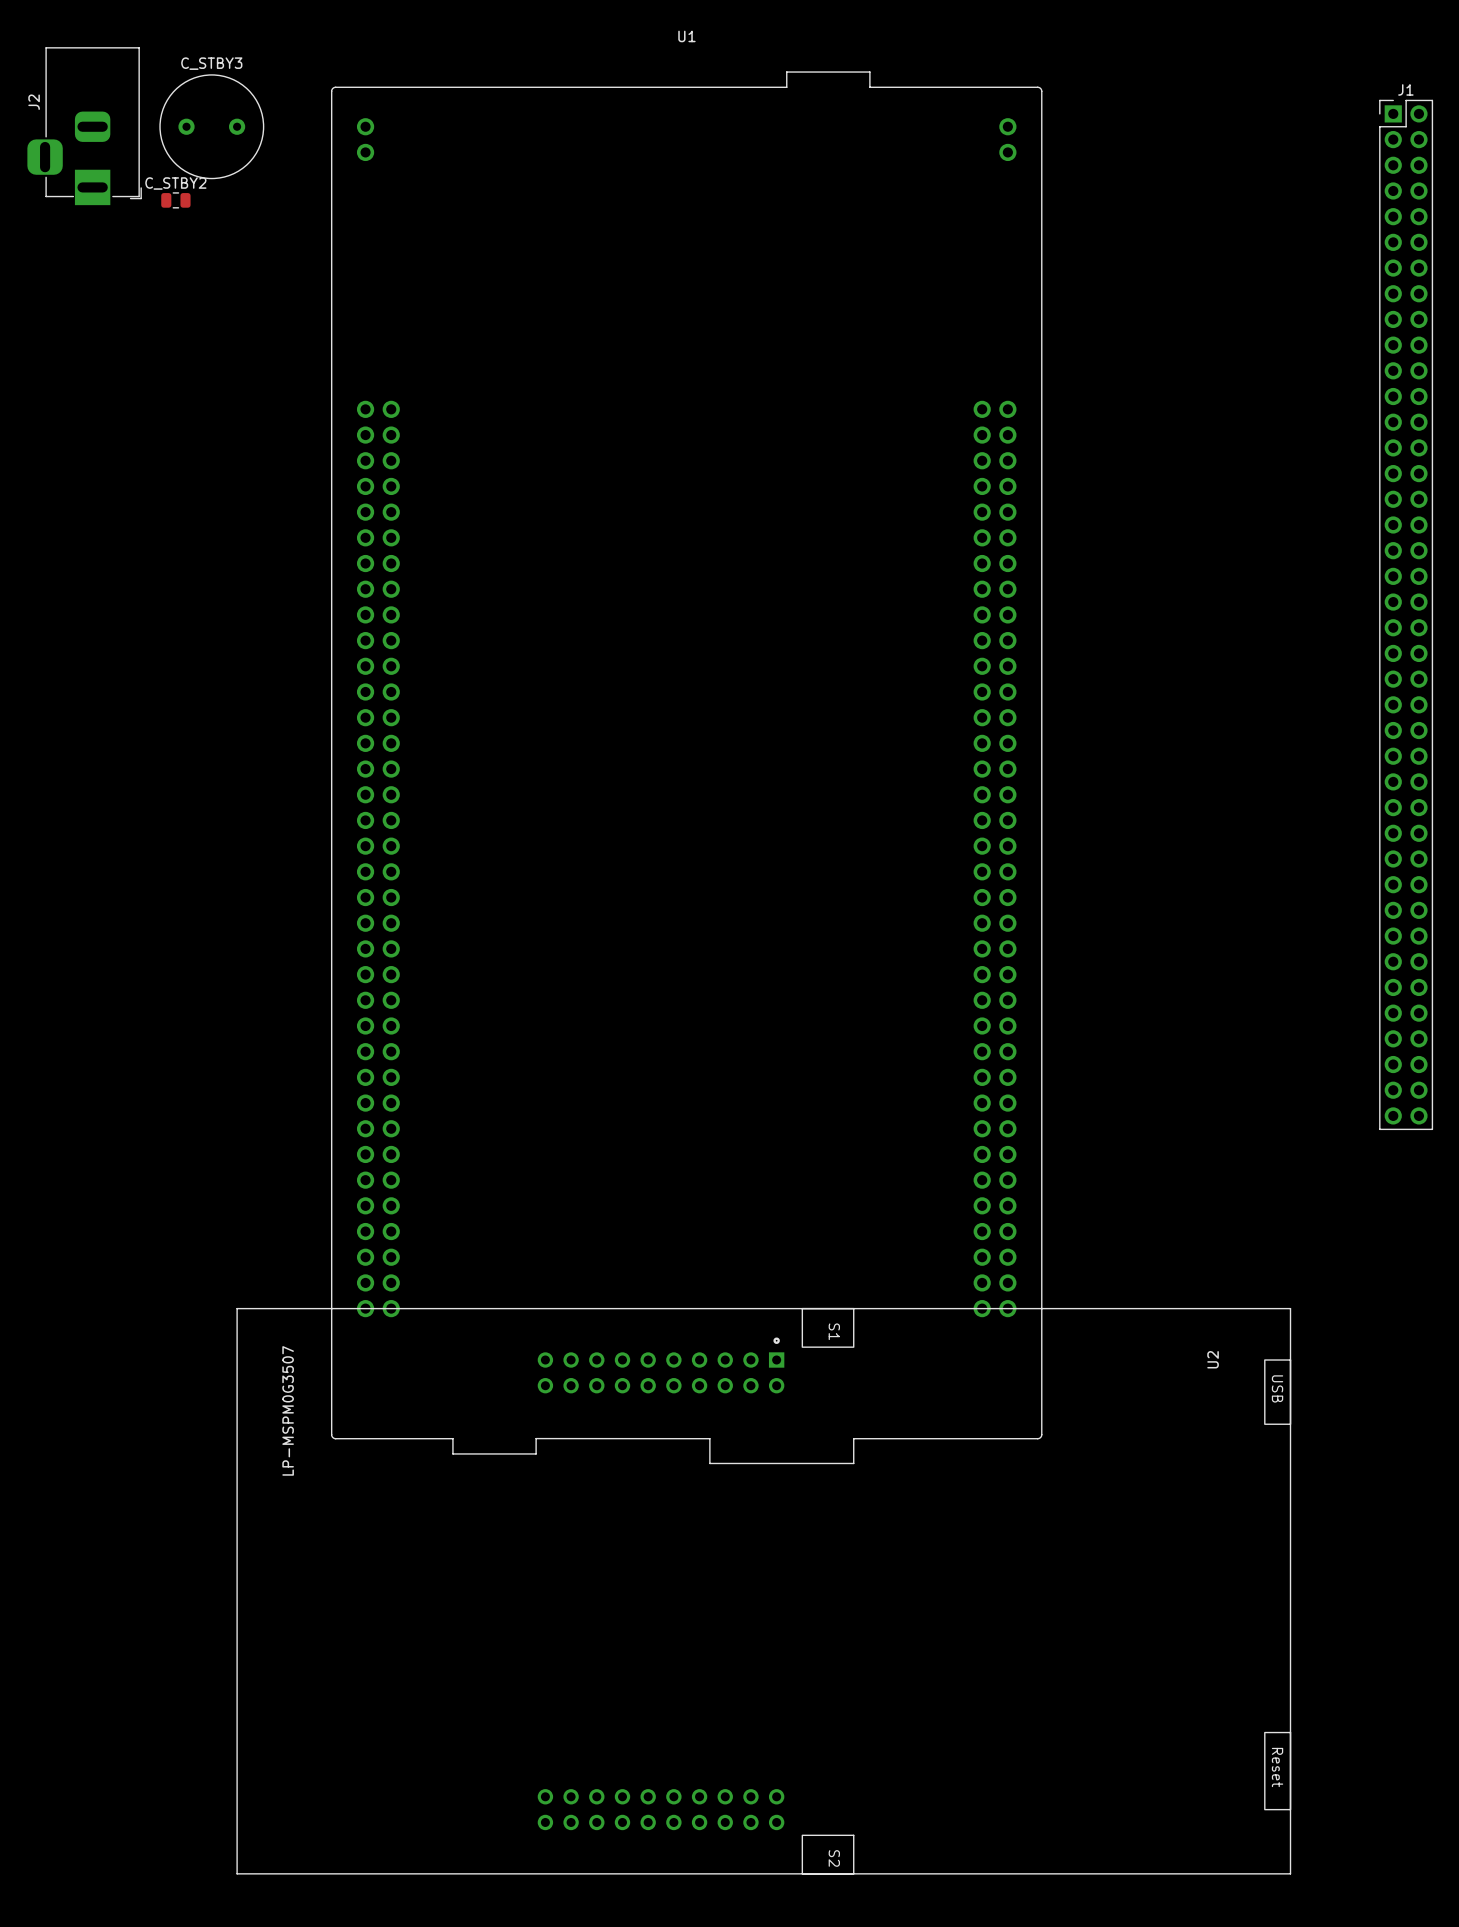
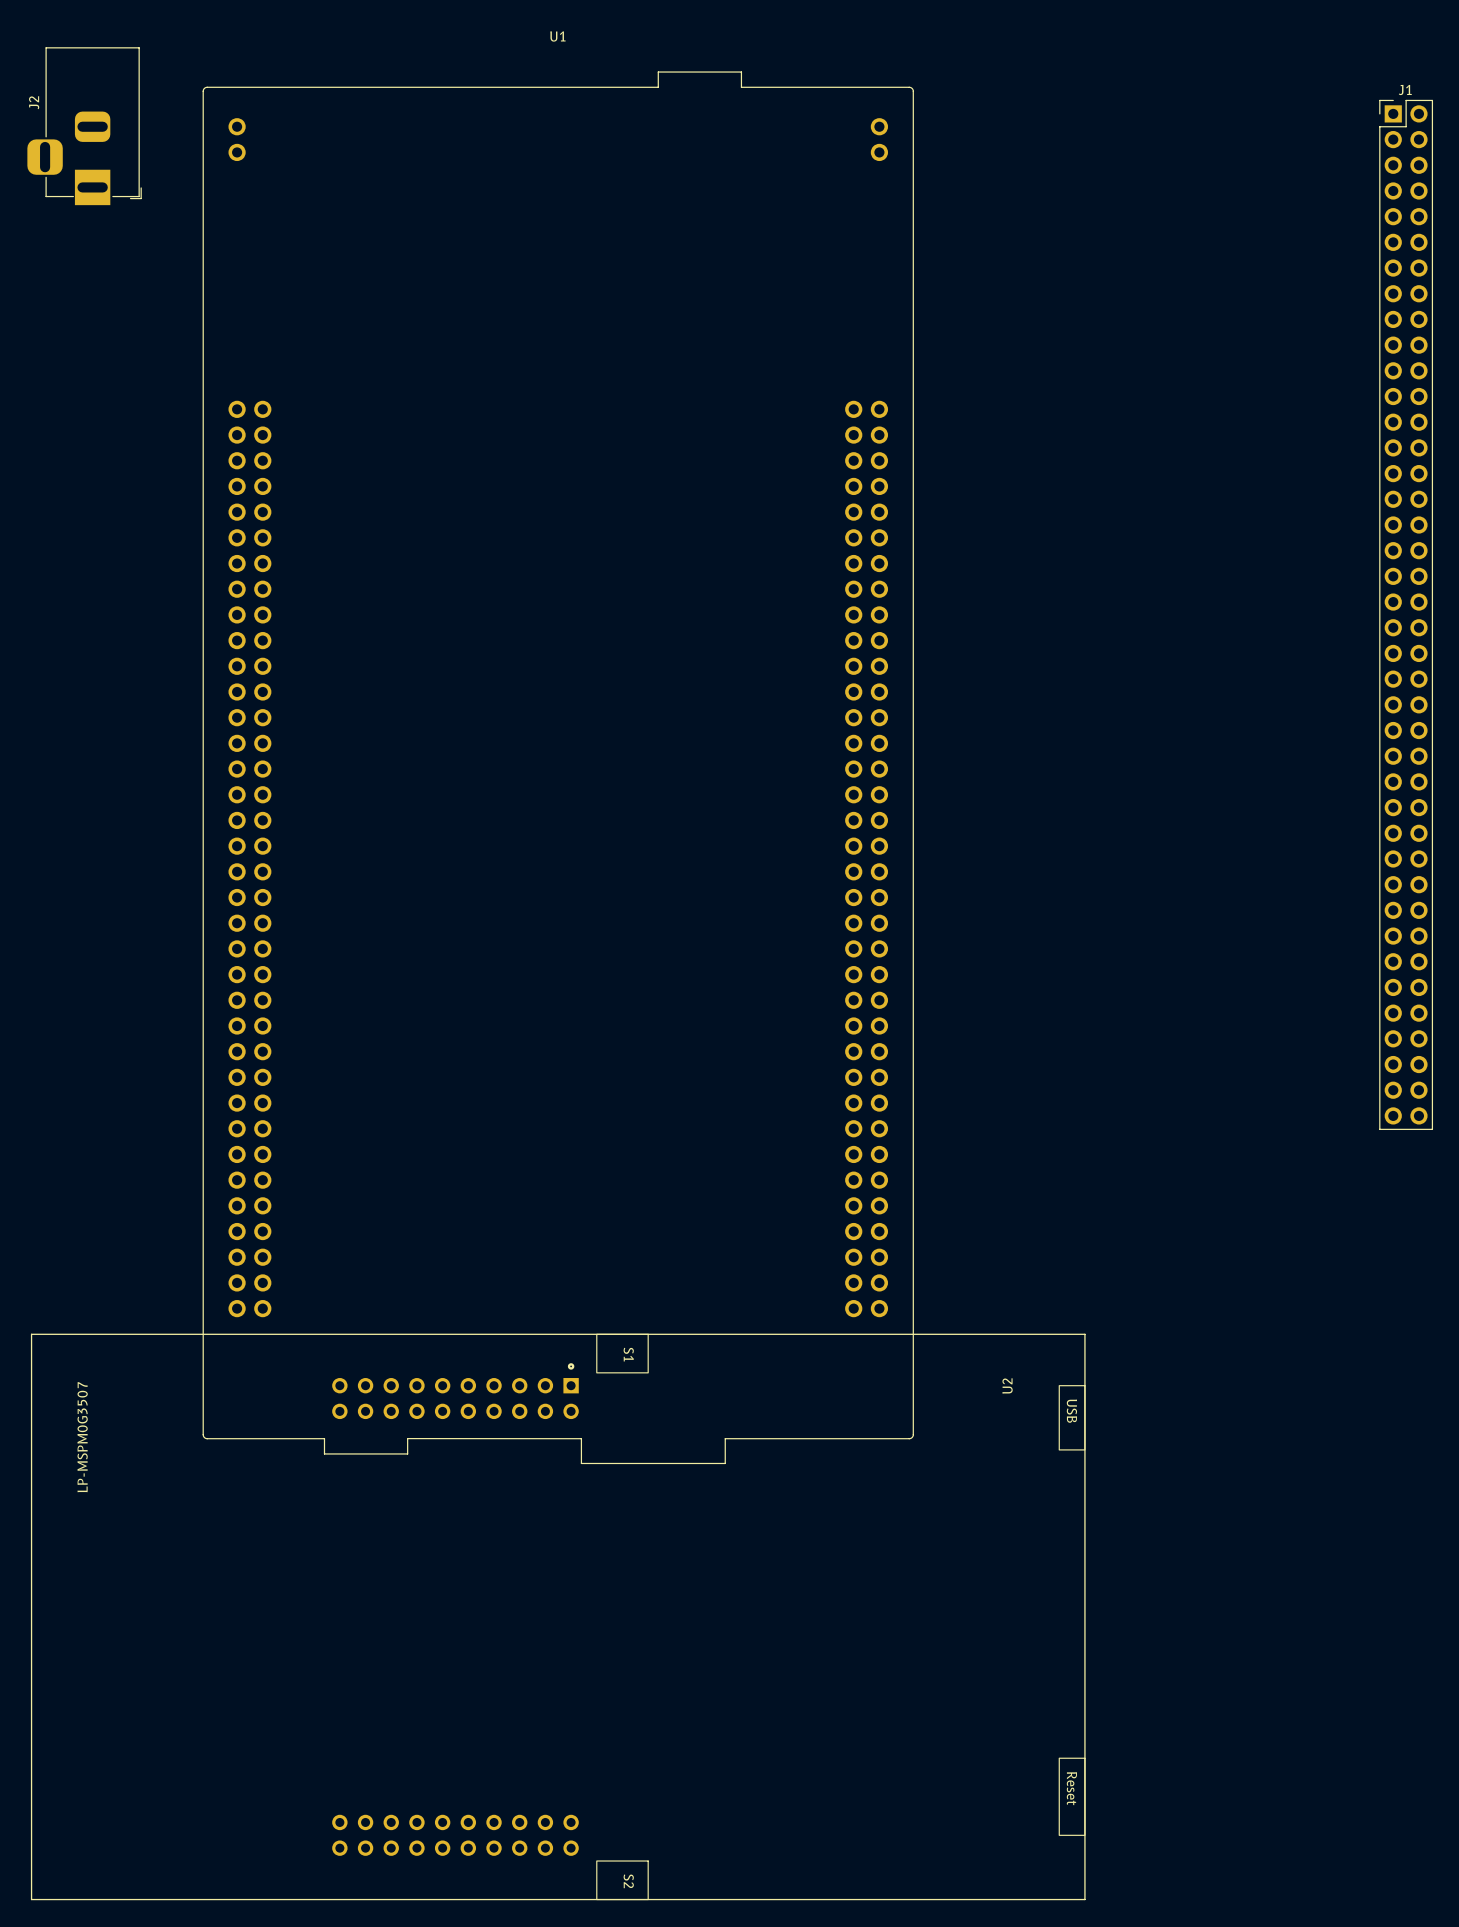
C_STBY3: (211, 126) -> none
C_STBY2: (175, 200) -> none
U1 position: (686, 767) -> (558, 767)
U2 position: (763, 1591) -> (558, 1616)

